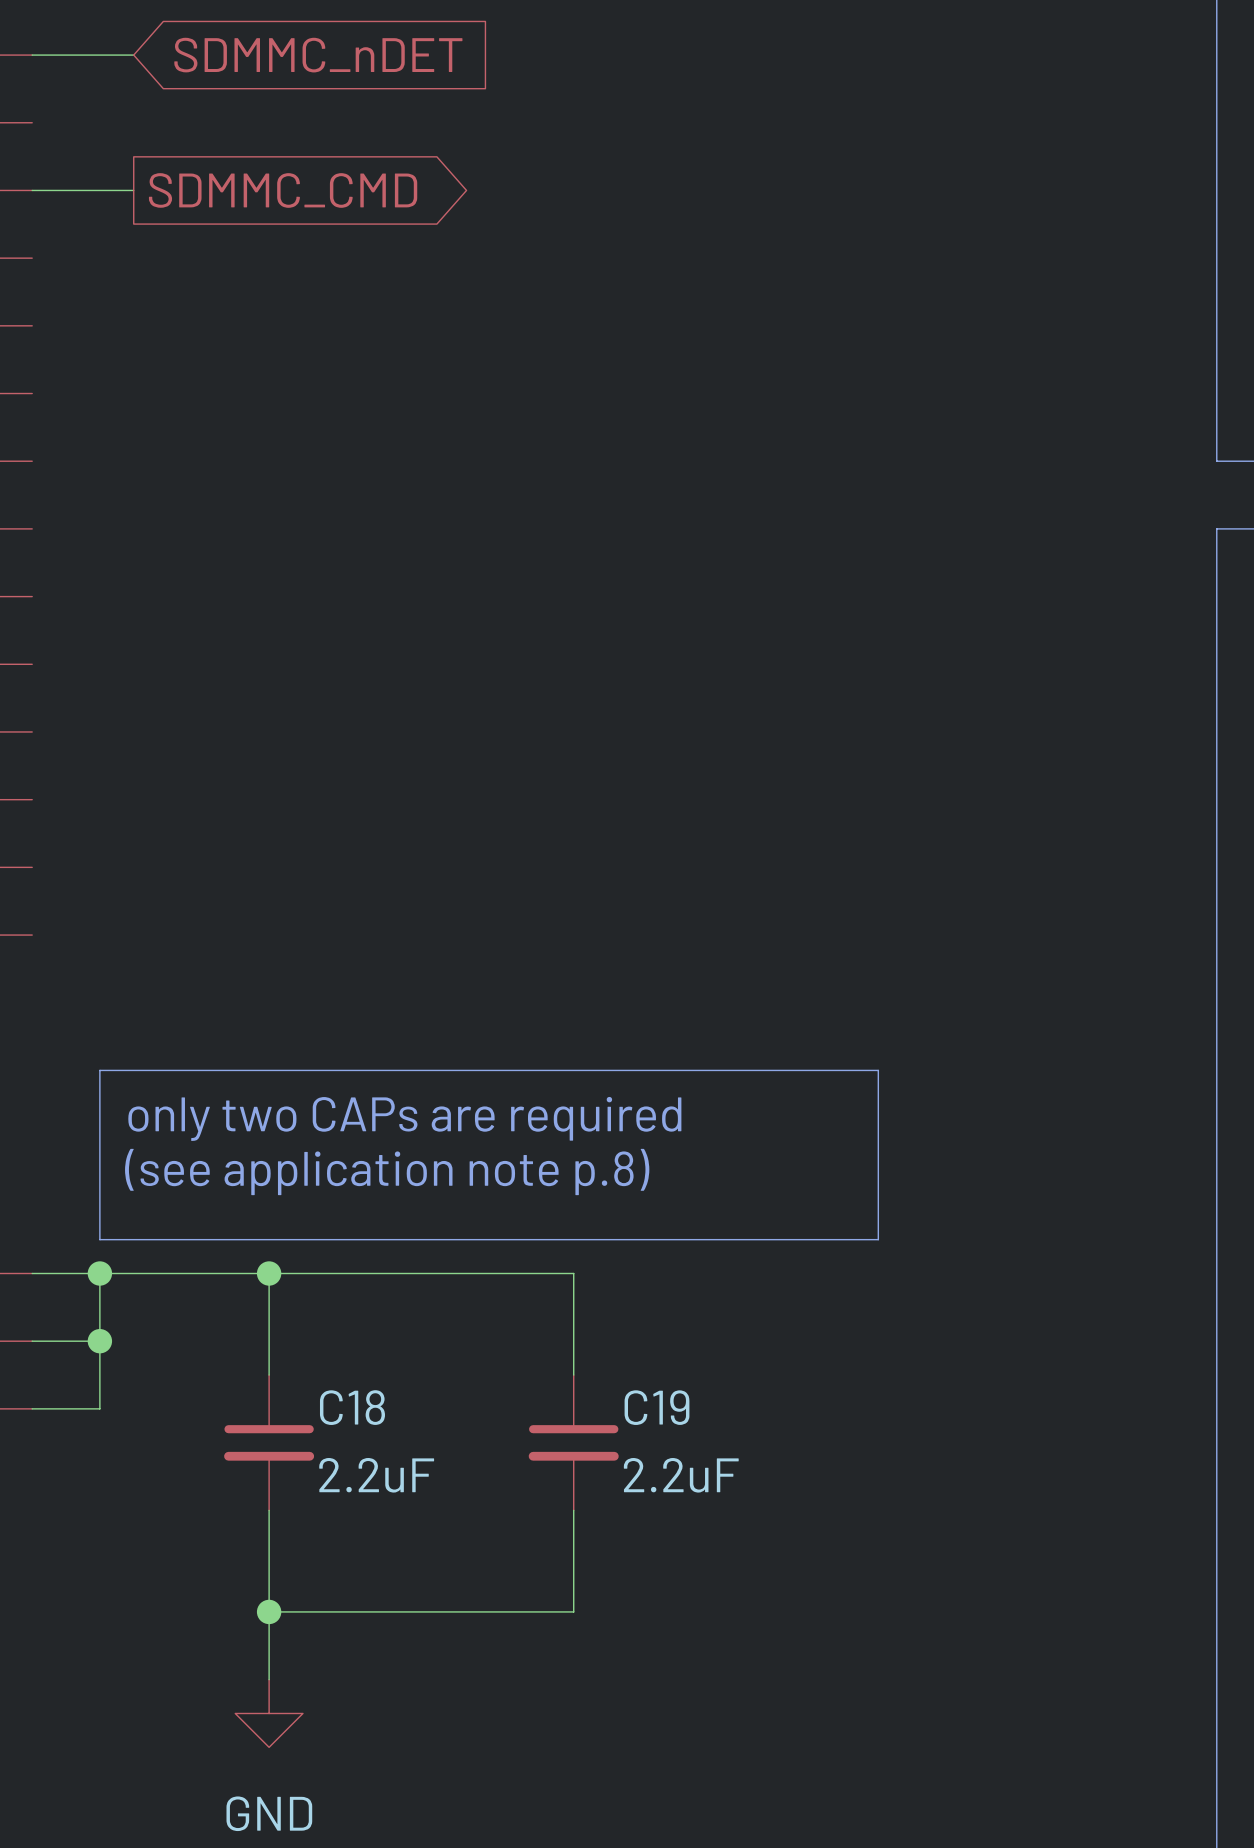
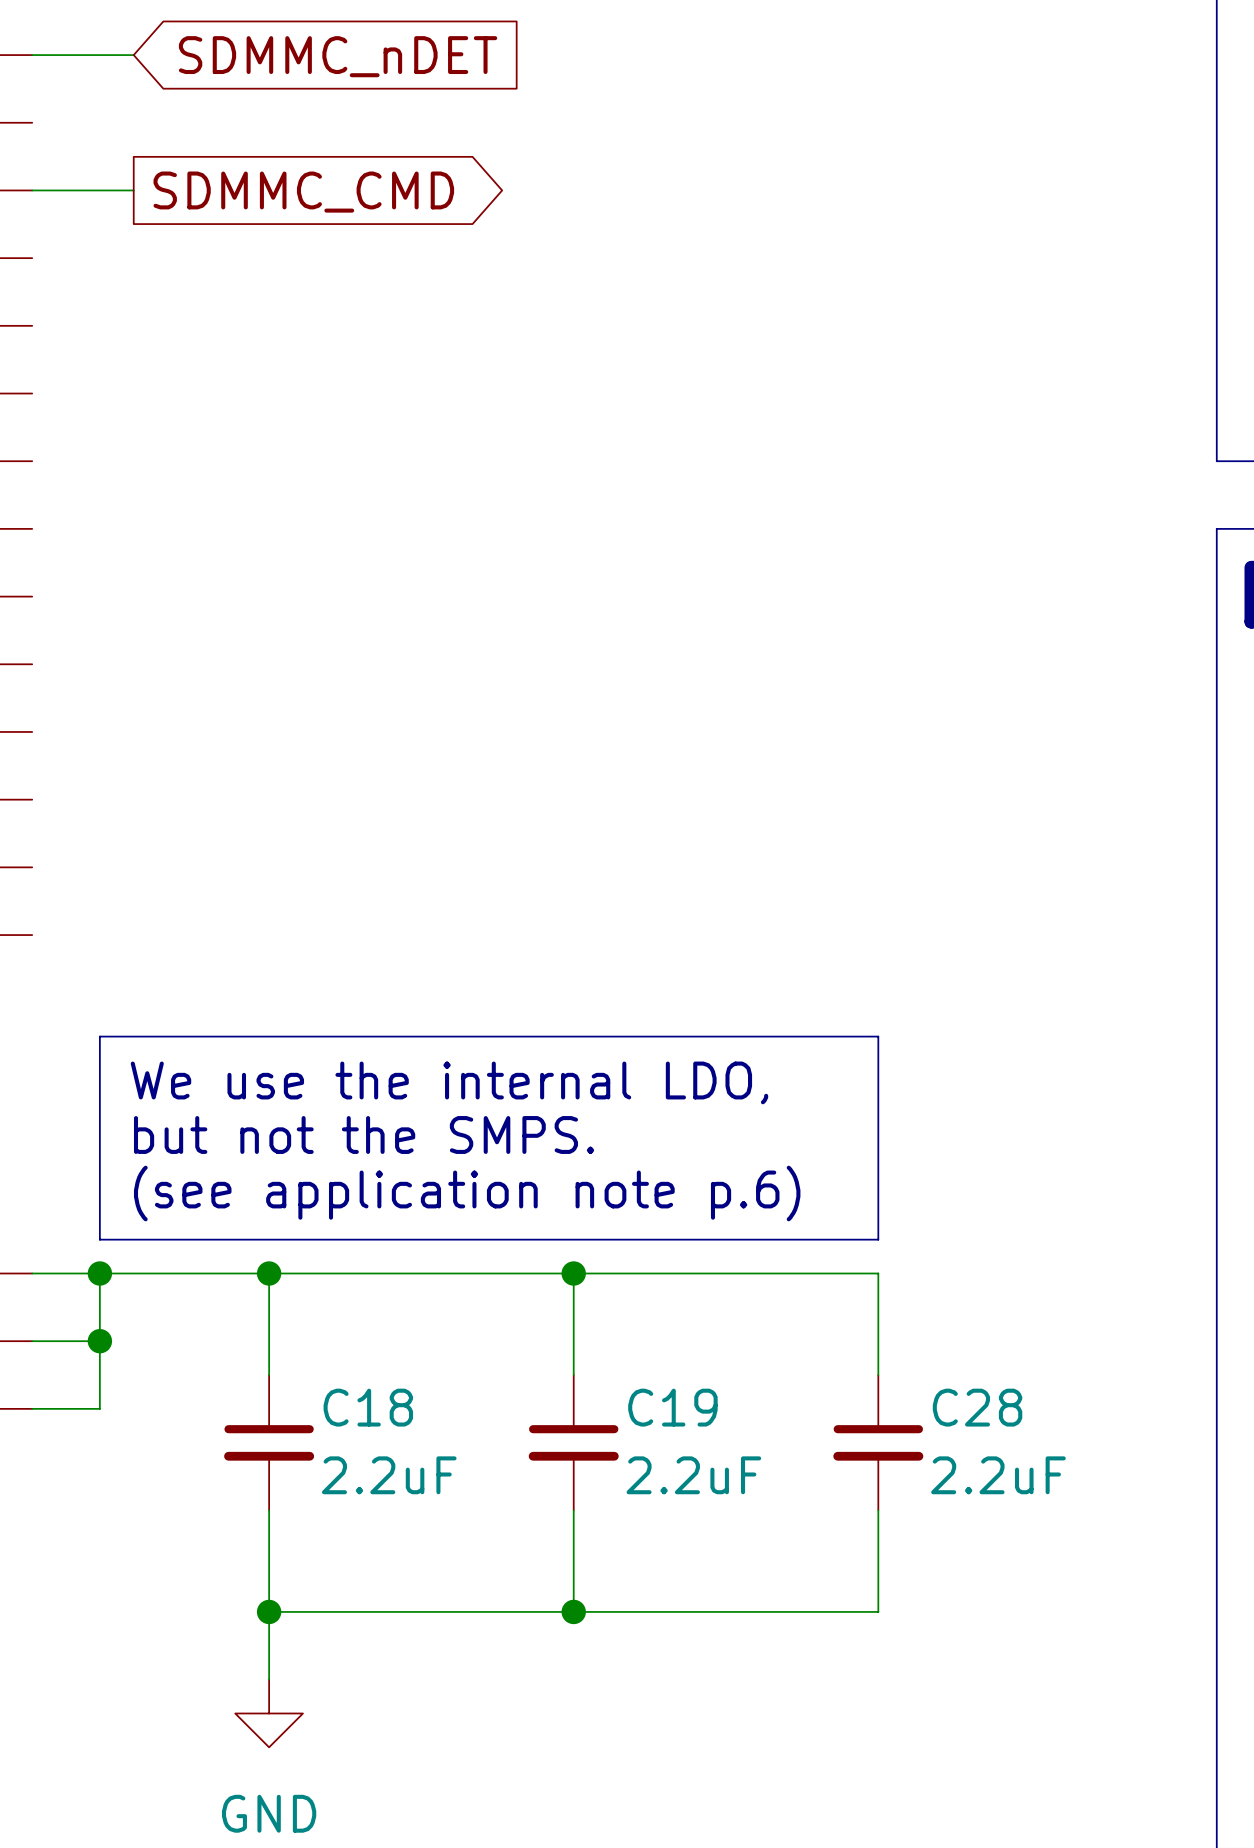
line: (99, 1070) (878, 1070) -> (99, 1070) (99, 1036) (878, 1036) (878, 1070)
text: none -> We use the internal LDO, (449, 1082)
text: only two CAPs are required (404, 1118) -> none
text: none -> but not the SMPS. (364, 1134)
text: (see application note p.8) (387, 1172) -> (see application note p.6) (467, 1193)
wire: none -> (573, 1273) (878, 1273) (878, 1375)
junction: none -> (573, 1273)
C28: none -> 2.2uF (878, 1442)
wire: none -> (878, 1510) (878, 1611) (573, 1611)
junction: none -> (573, 1611)

